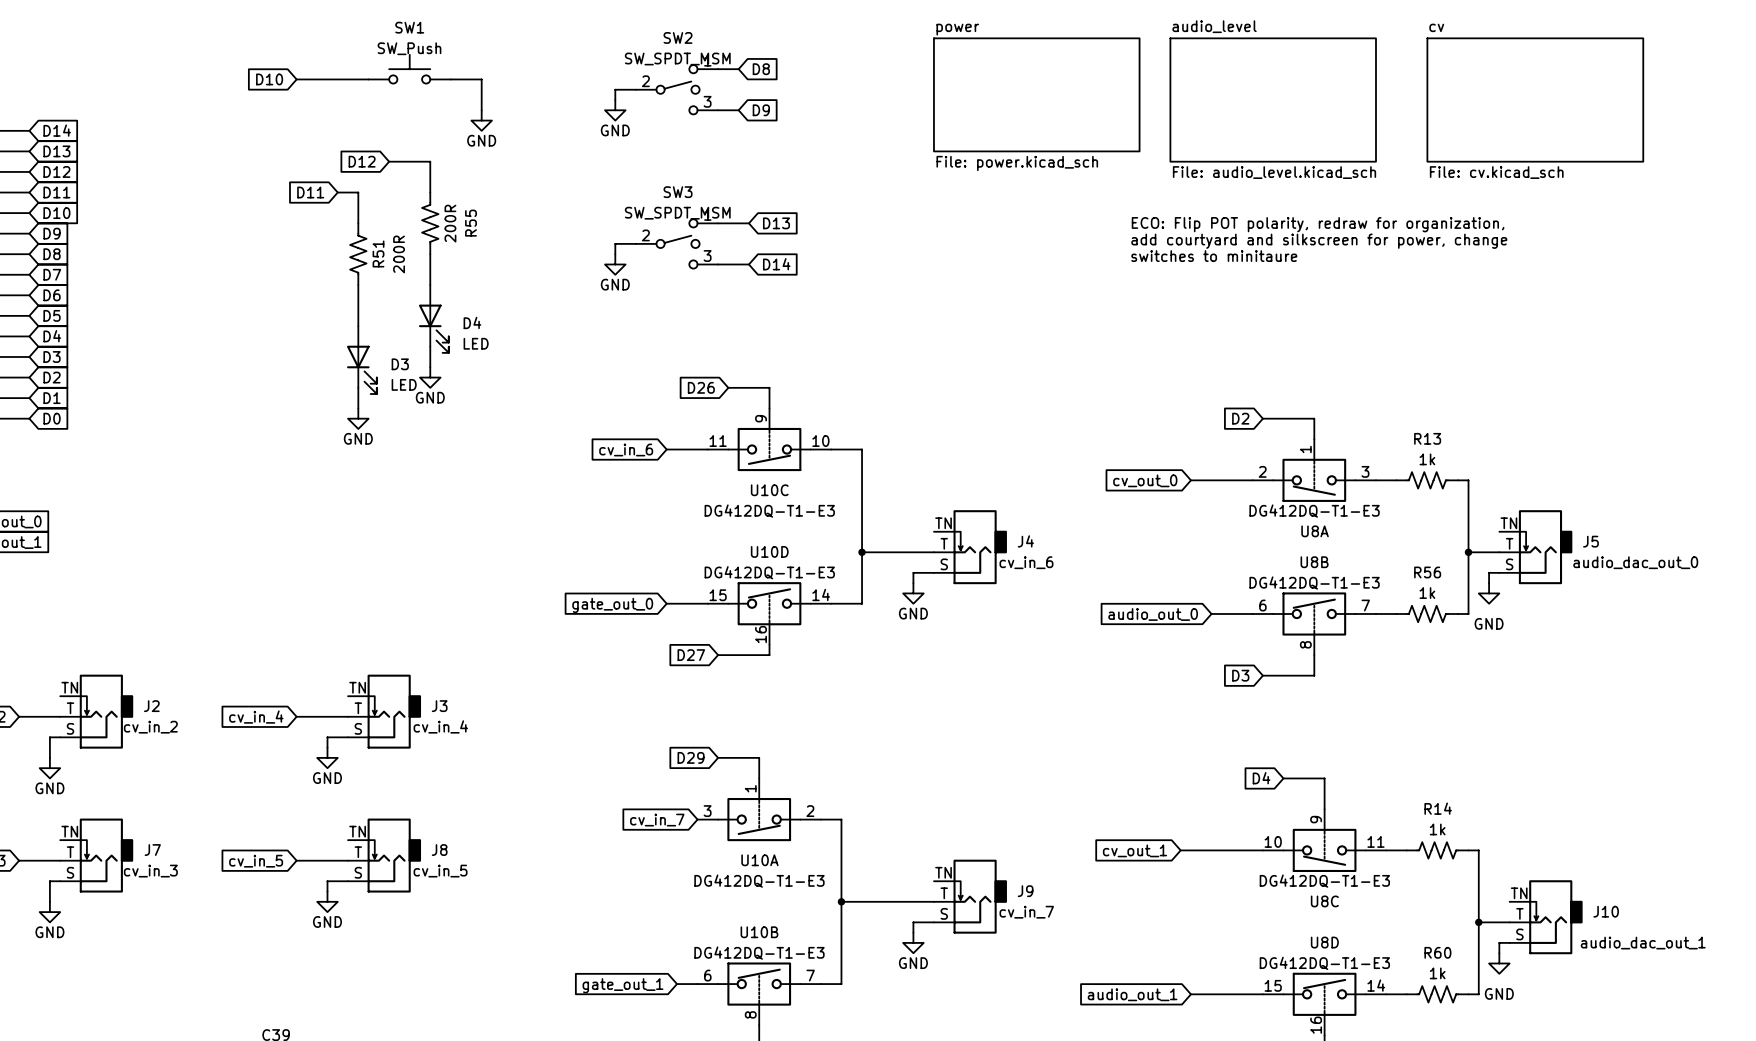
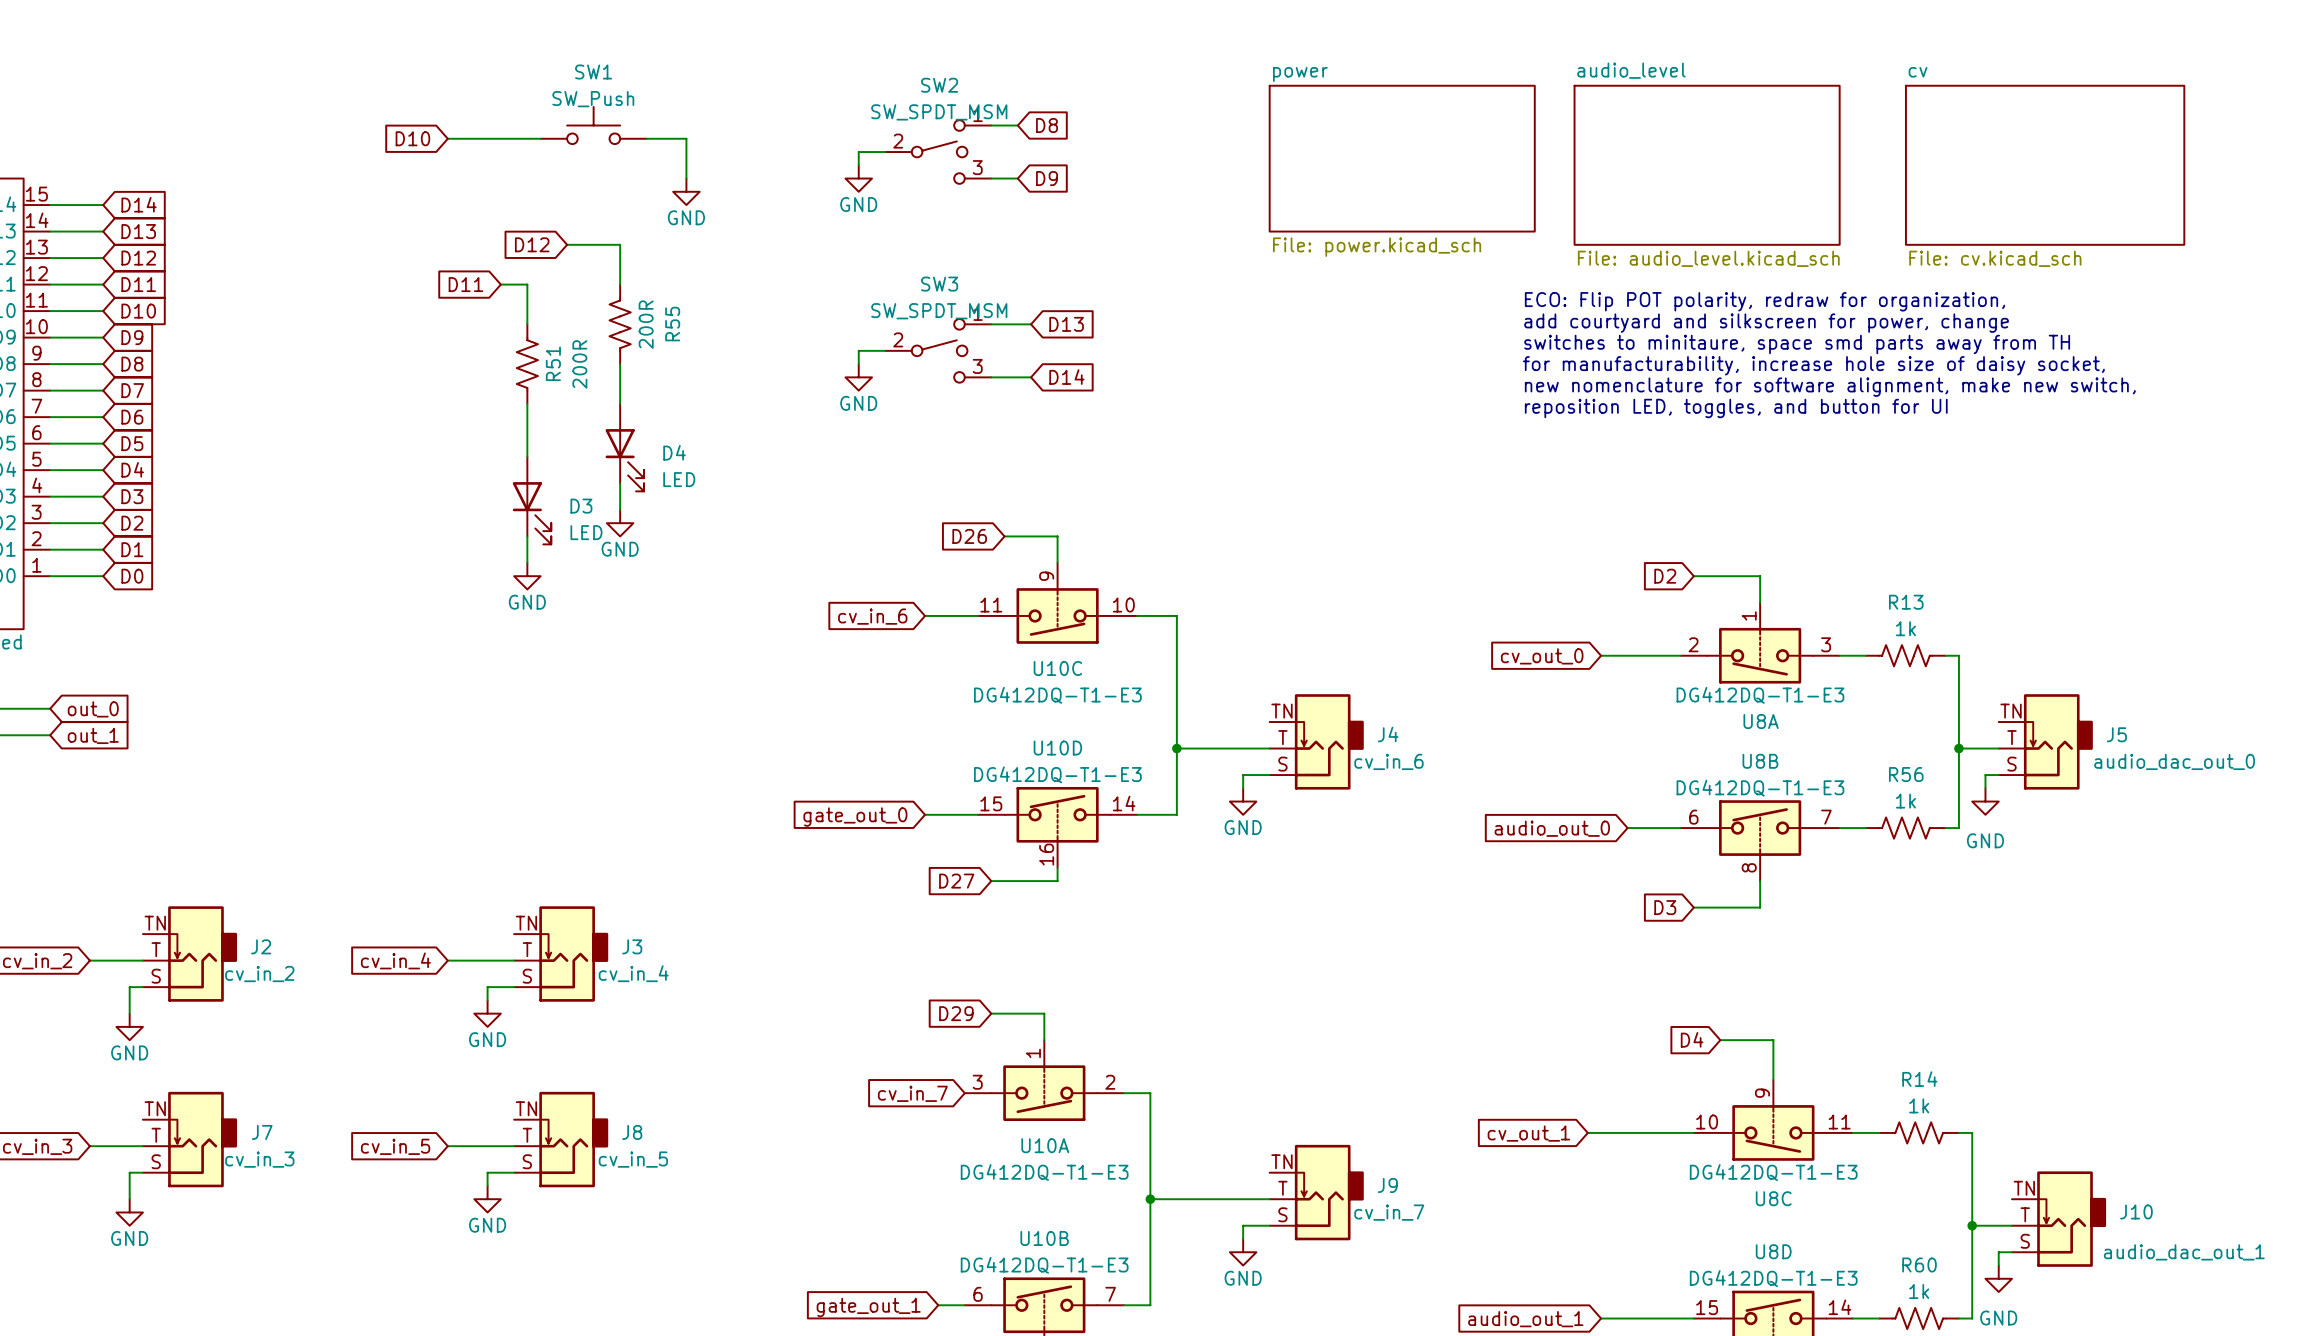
text: none -> ECO: Flip POT polarity, redraw for organization, (1764, 301)
text: ECO: Flip POT polarity, redraw for organization, (1318, 224) -> add courtyard and silkscreen for power, change (1766, 323)
text: add courtyard and silkscreen for power, change (1319, 241) -> switches to minitaure, space smd parts away from TH (1797, 344)
text: switches to minitaure (1214, 256) -> for manufacturability, increase hole size of daisy socket, (1813, 365)
text: none -> new nomenclature for software alignment, make new switch, (1830, 387)
text: none -> reposition LED, toggles, and button for UI (1736, 408)

